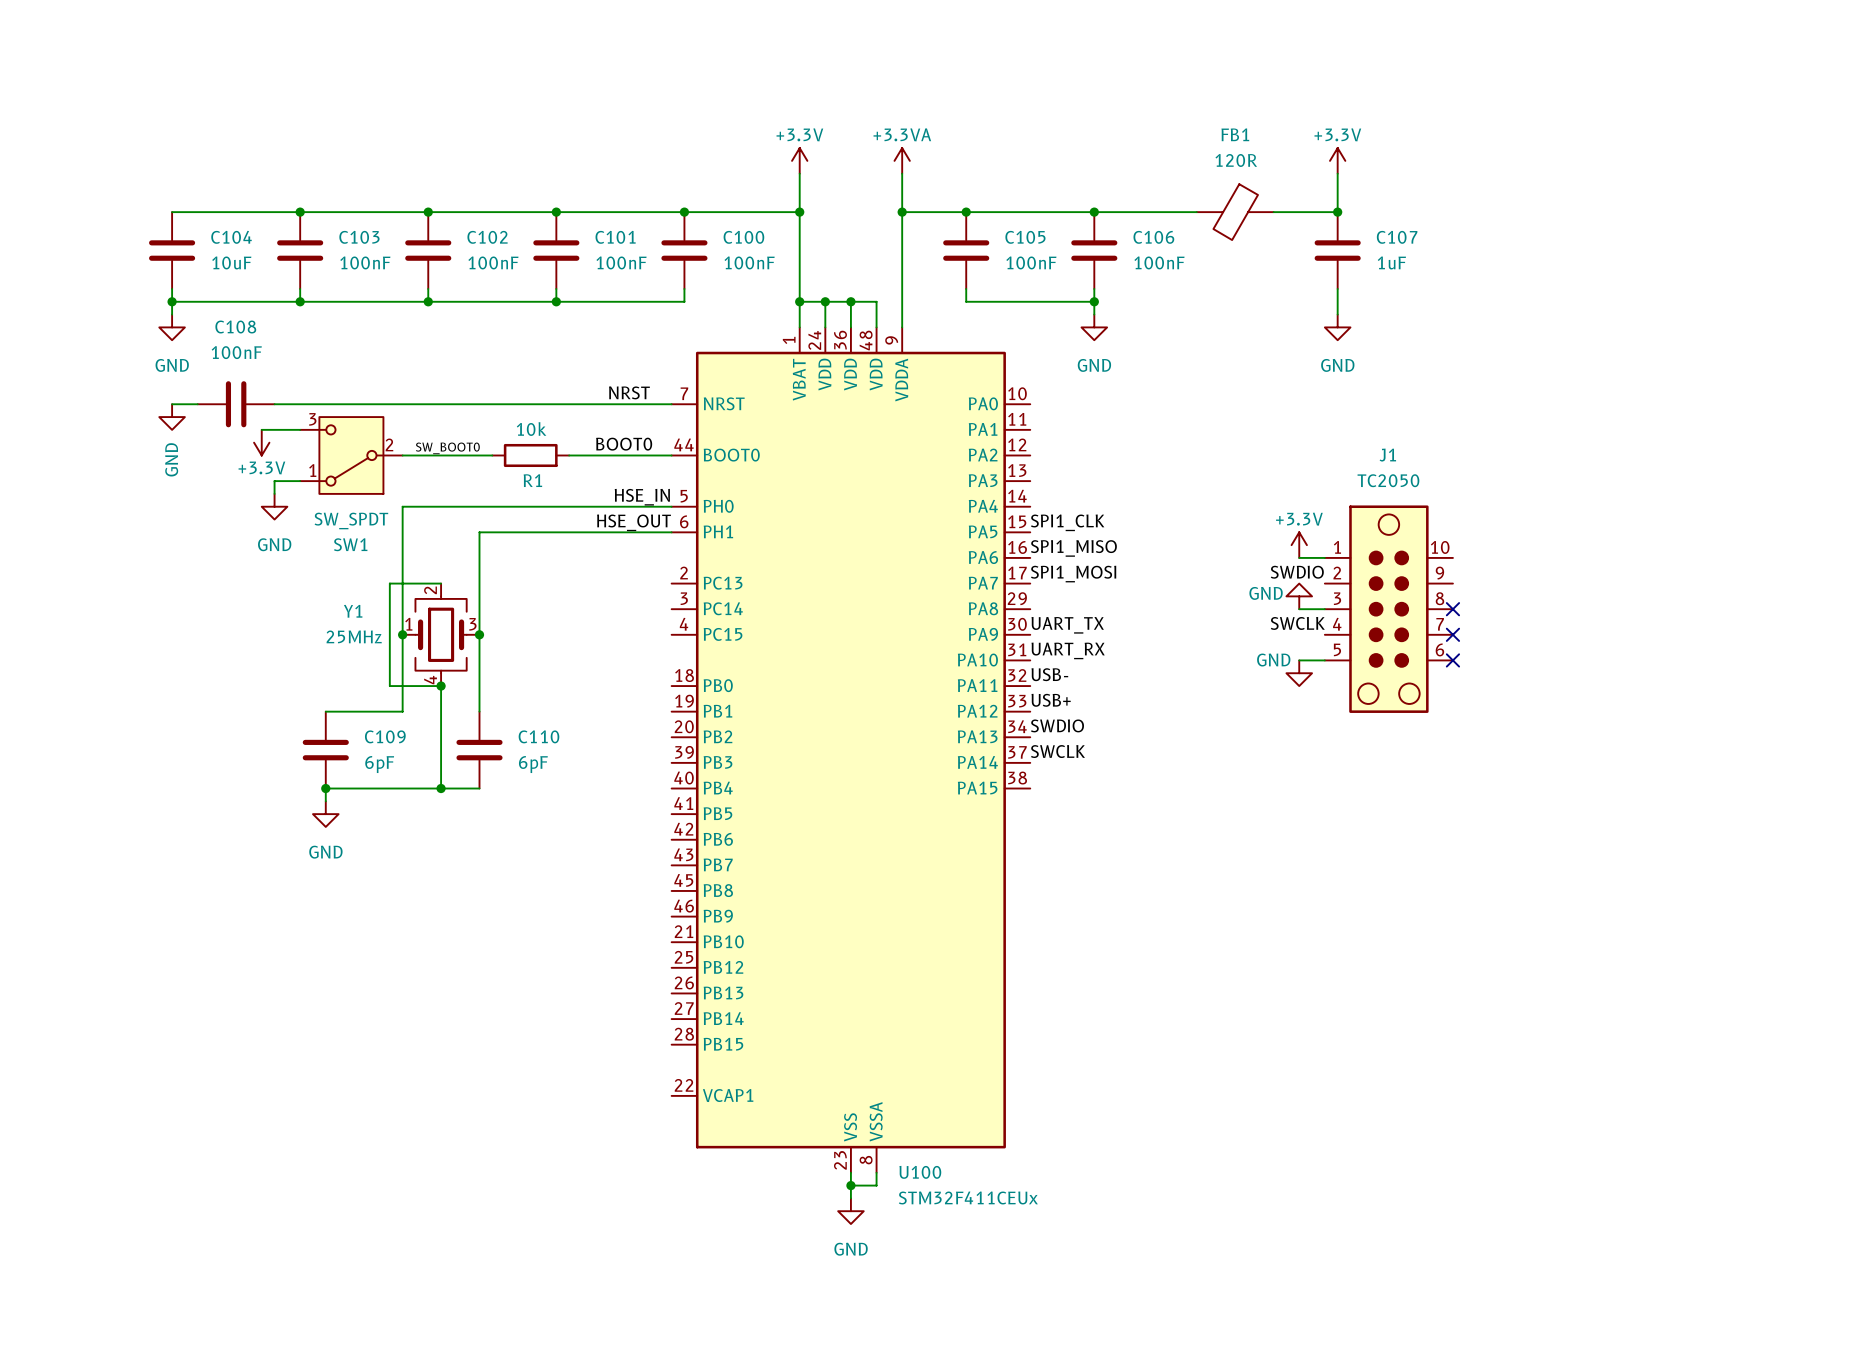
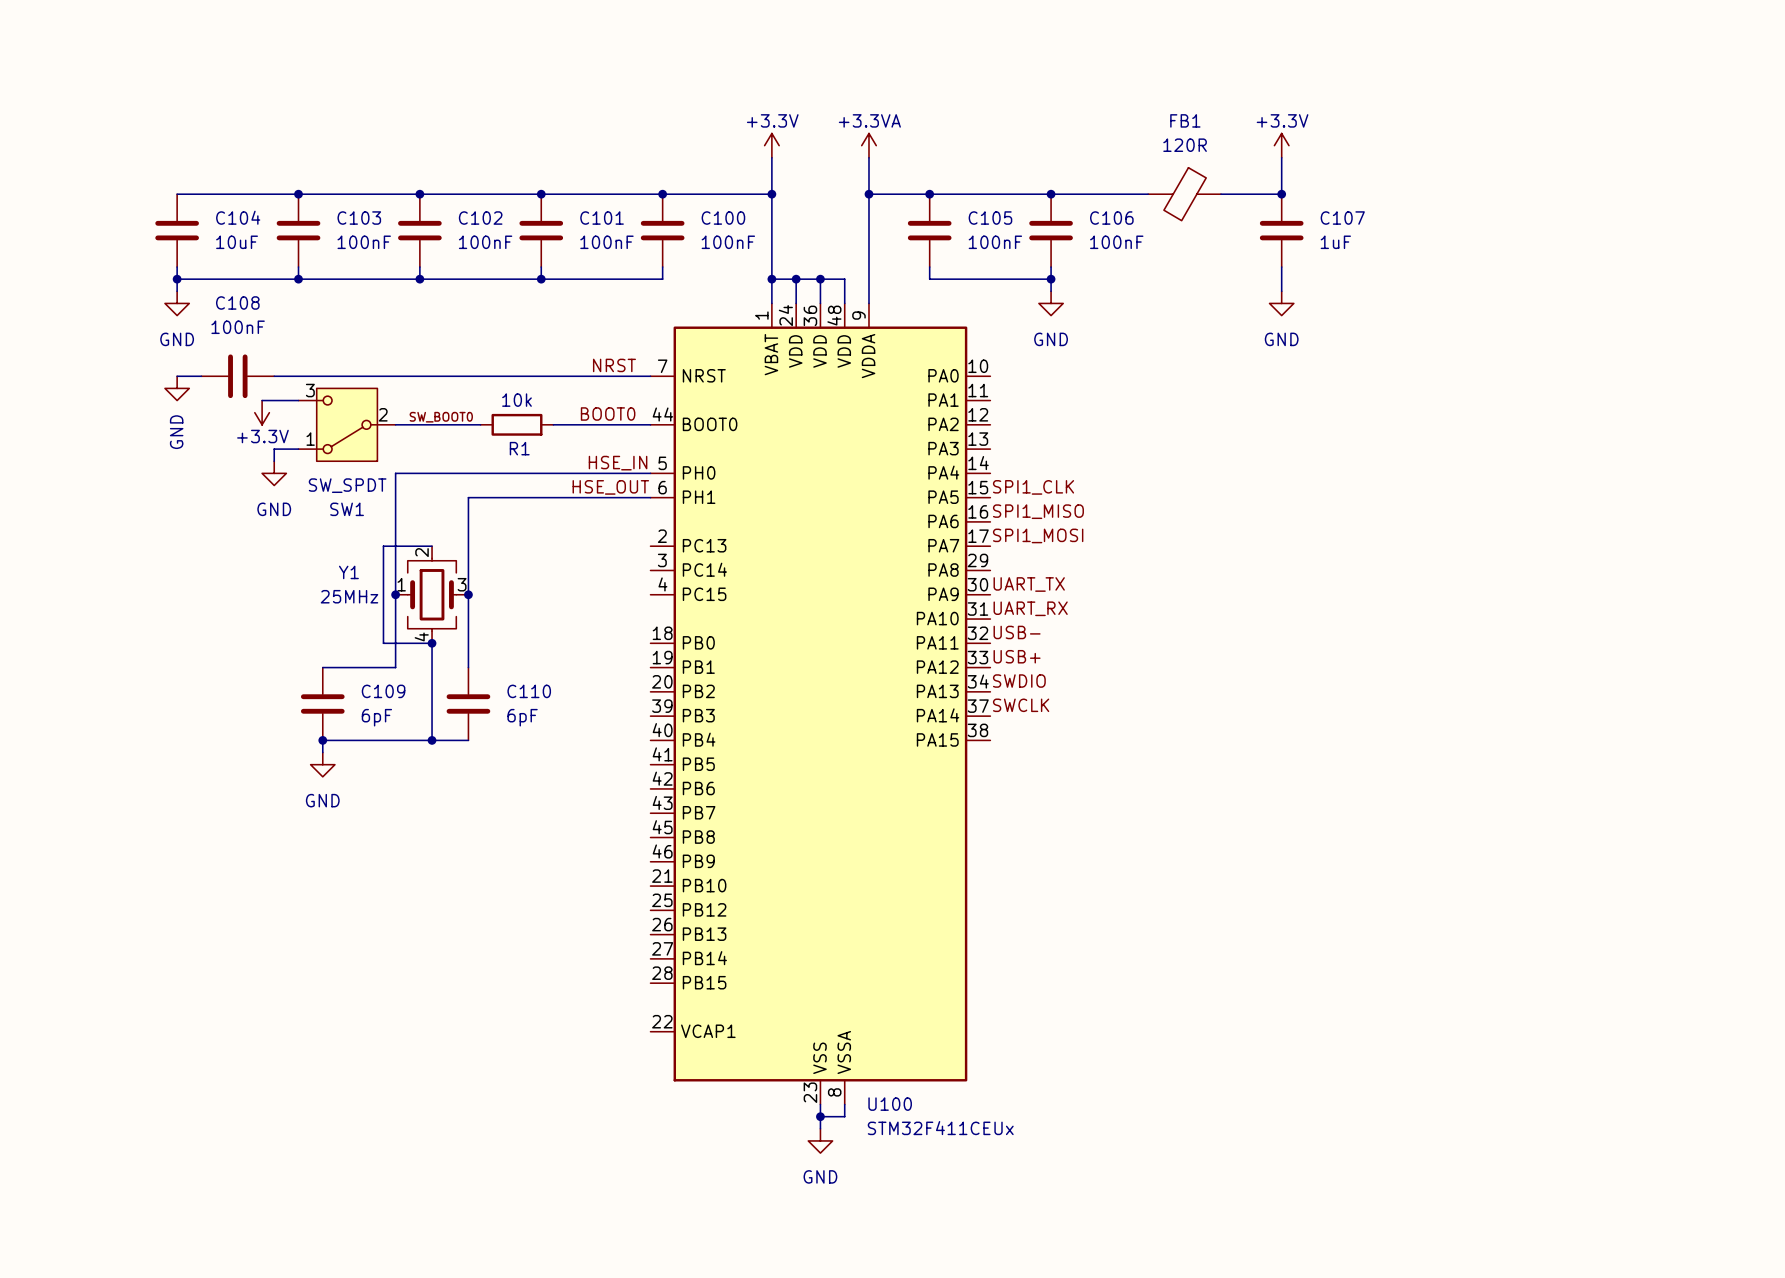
power symbol: +3.3V (1299, 545) -> none
wire: (1299, 557) (1324, 557) -> none
label: SWDIO (1297, 572) -> none
power symbol: GND (1299, 596) -> none
wire: (1299, 609) (1324, 609) -> none
J1: TC2050 (1388, 609) -> none
no-connect mark: (1452, 609) -> none
label: SWCLK (1297, 623) -> none
no-connect mark: (1452, 634) -> none
wire: (1299, 660) (1324, 660) -> none
no-connect mark: (1452, 660) -> none
power symbol: GND (1299, 673) -> none

